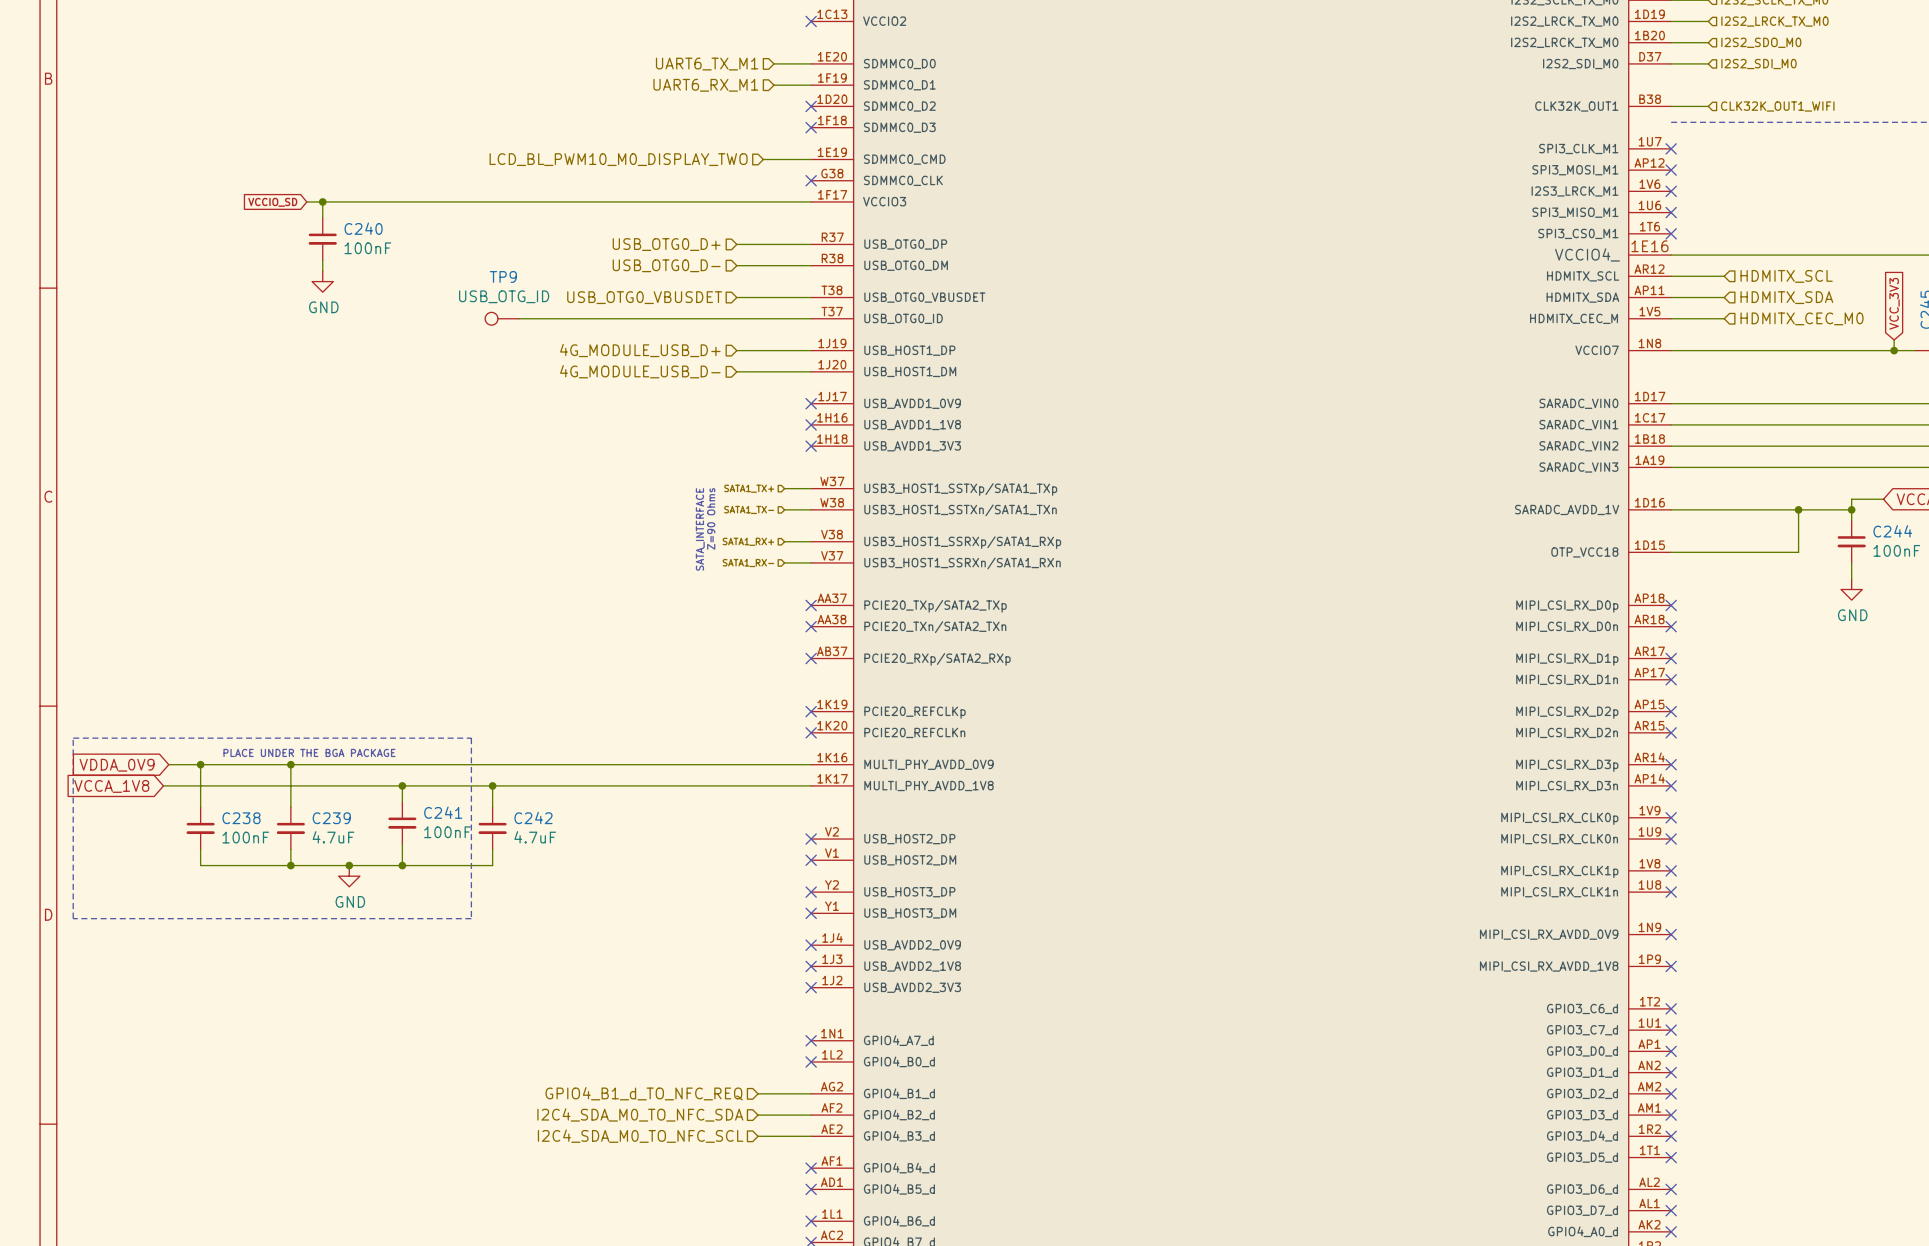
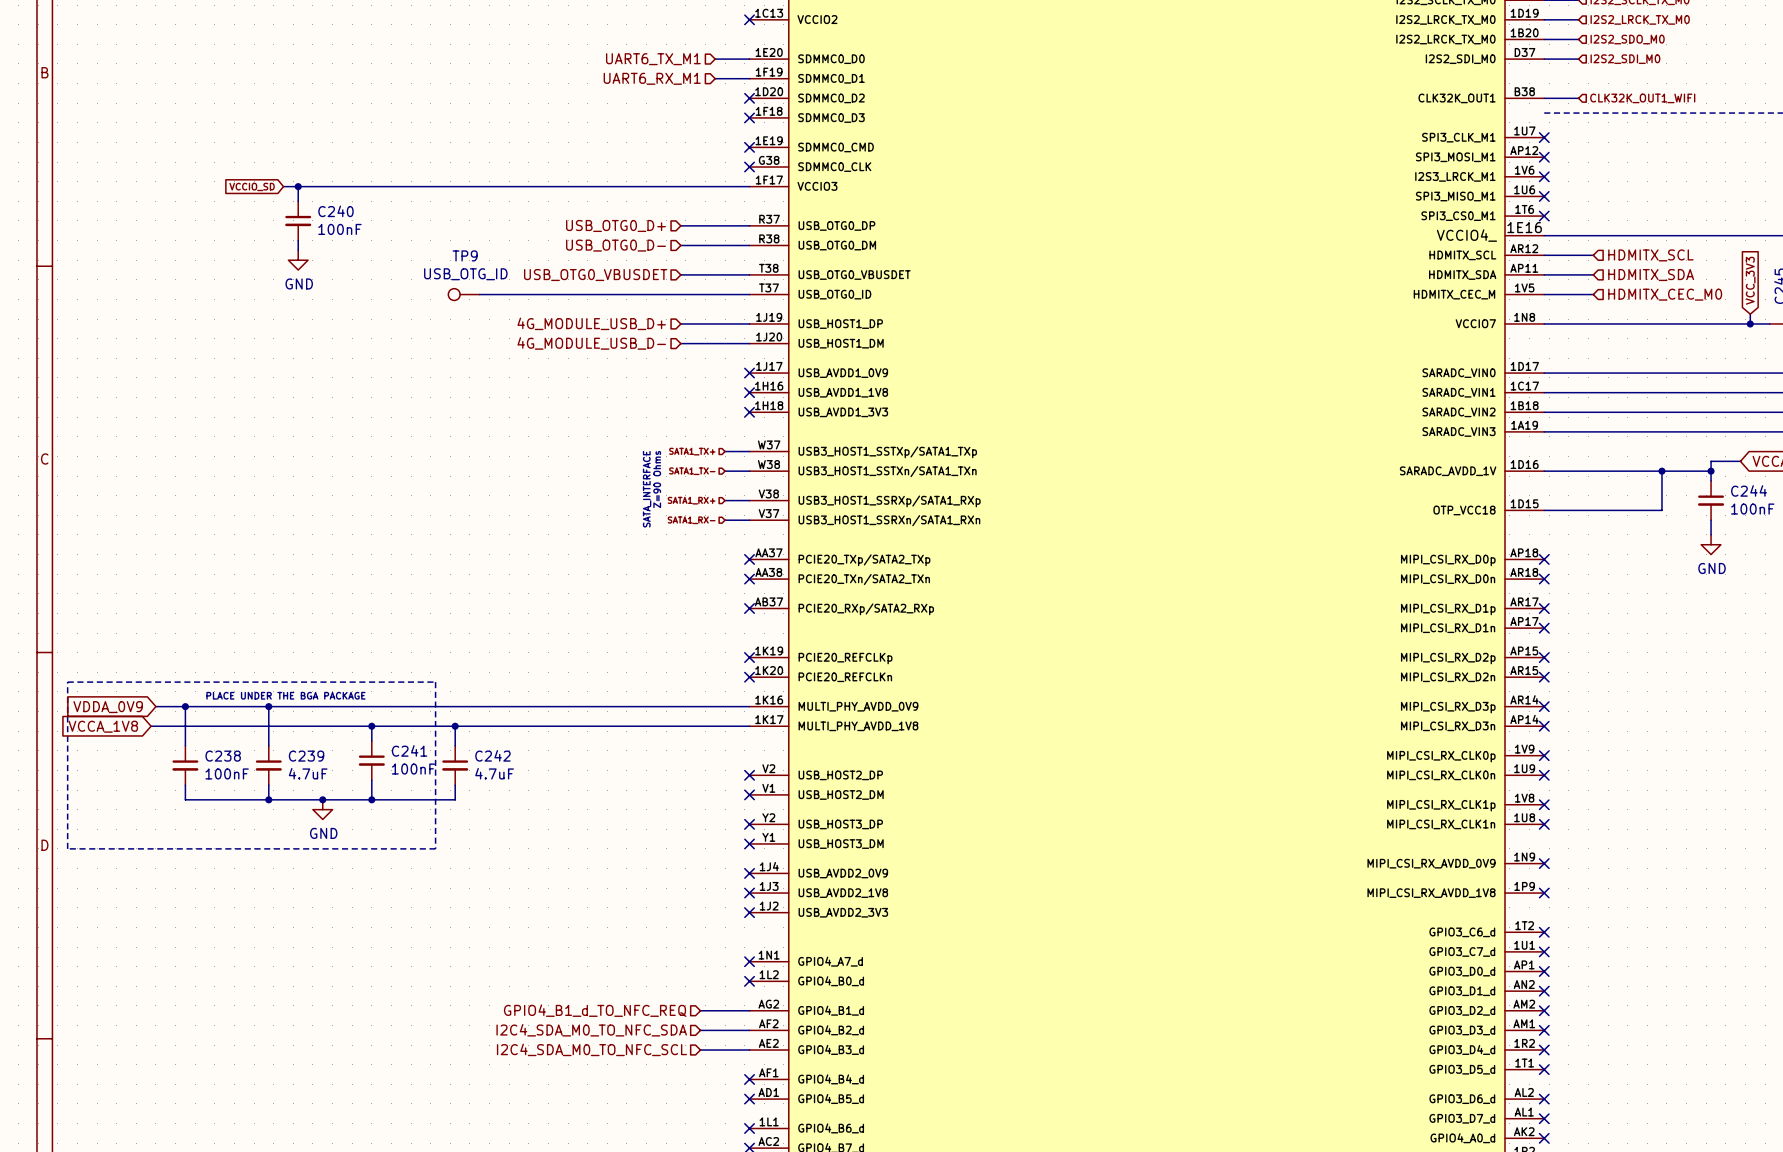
hierarchical label: LCD_BL_PWM10_M0_DISPLAY_TWO (618, 159) -> none
wire: (763, 159) (811, 159) -> none
no-connect mark: none -> (749, 147)

